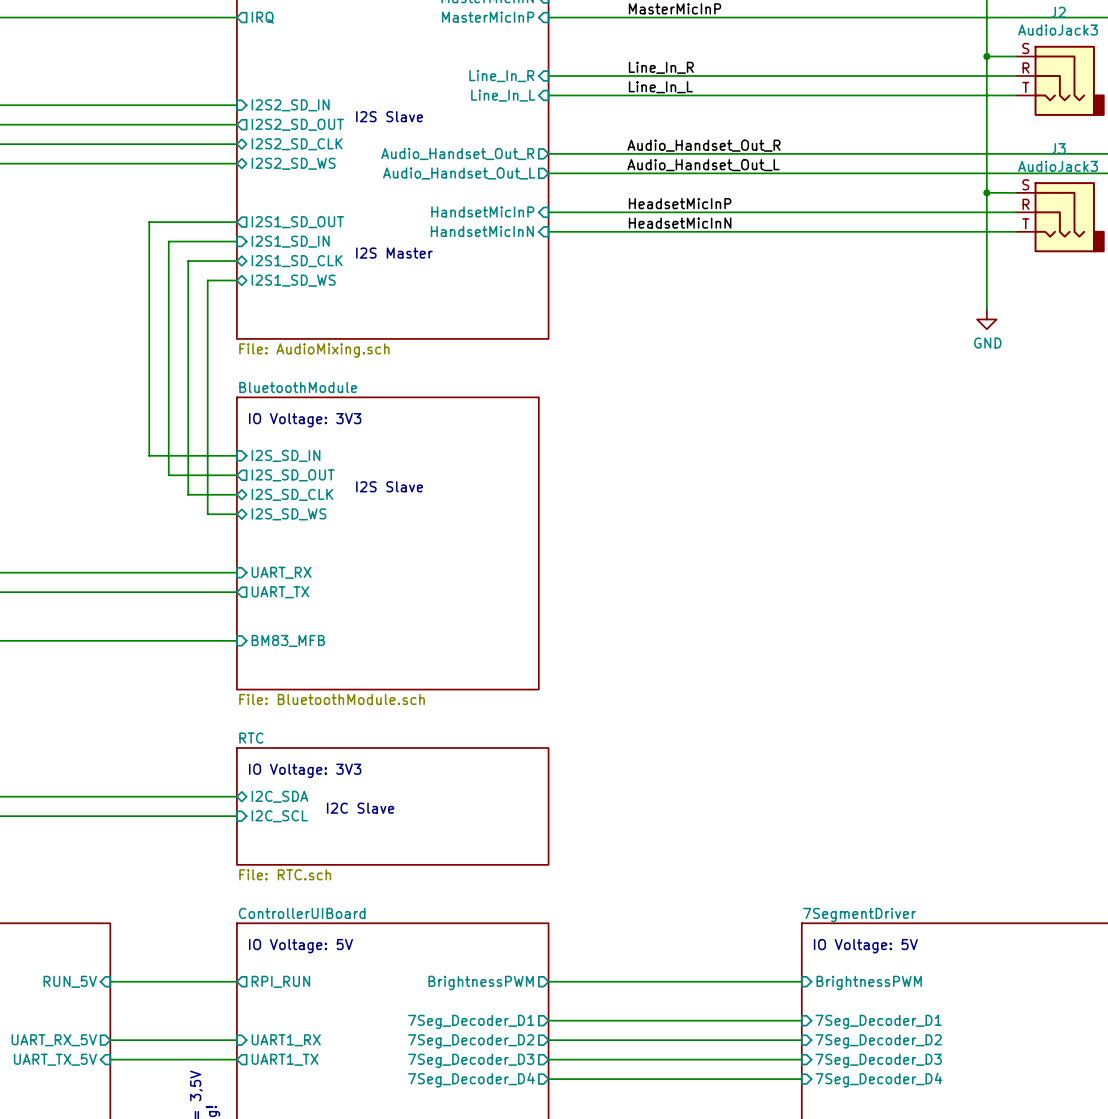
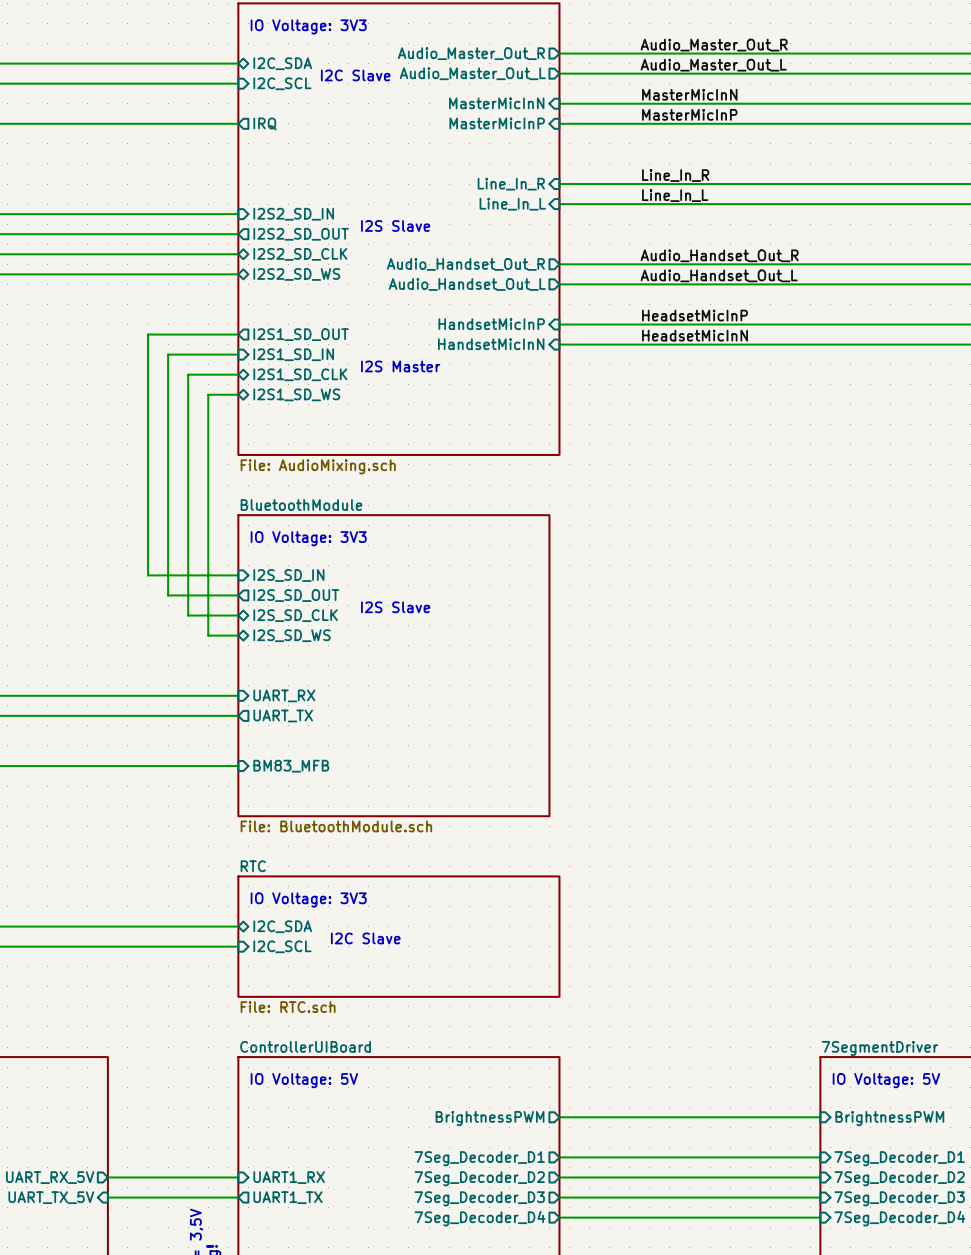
sheet pin: RUN_5V (70, 981) -> none
wire: (110, 981) (236, 981) -> none
sheet pin: RPI_RUN (280, 981) -> none

